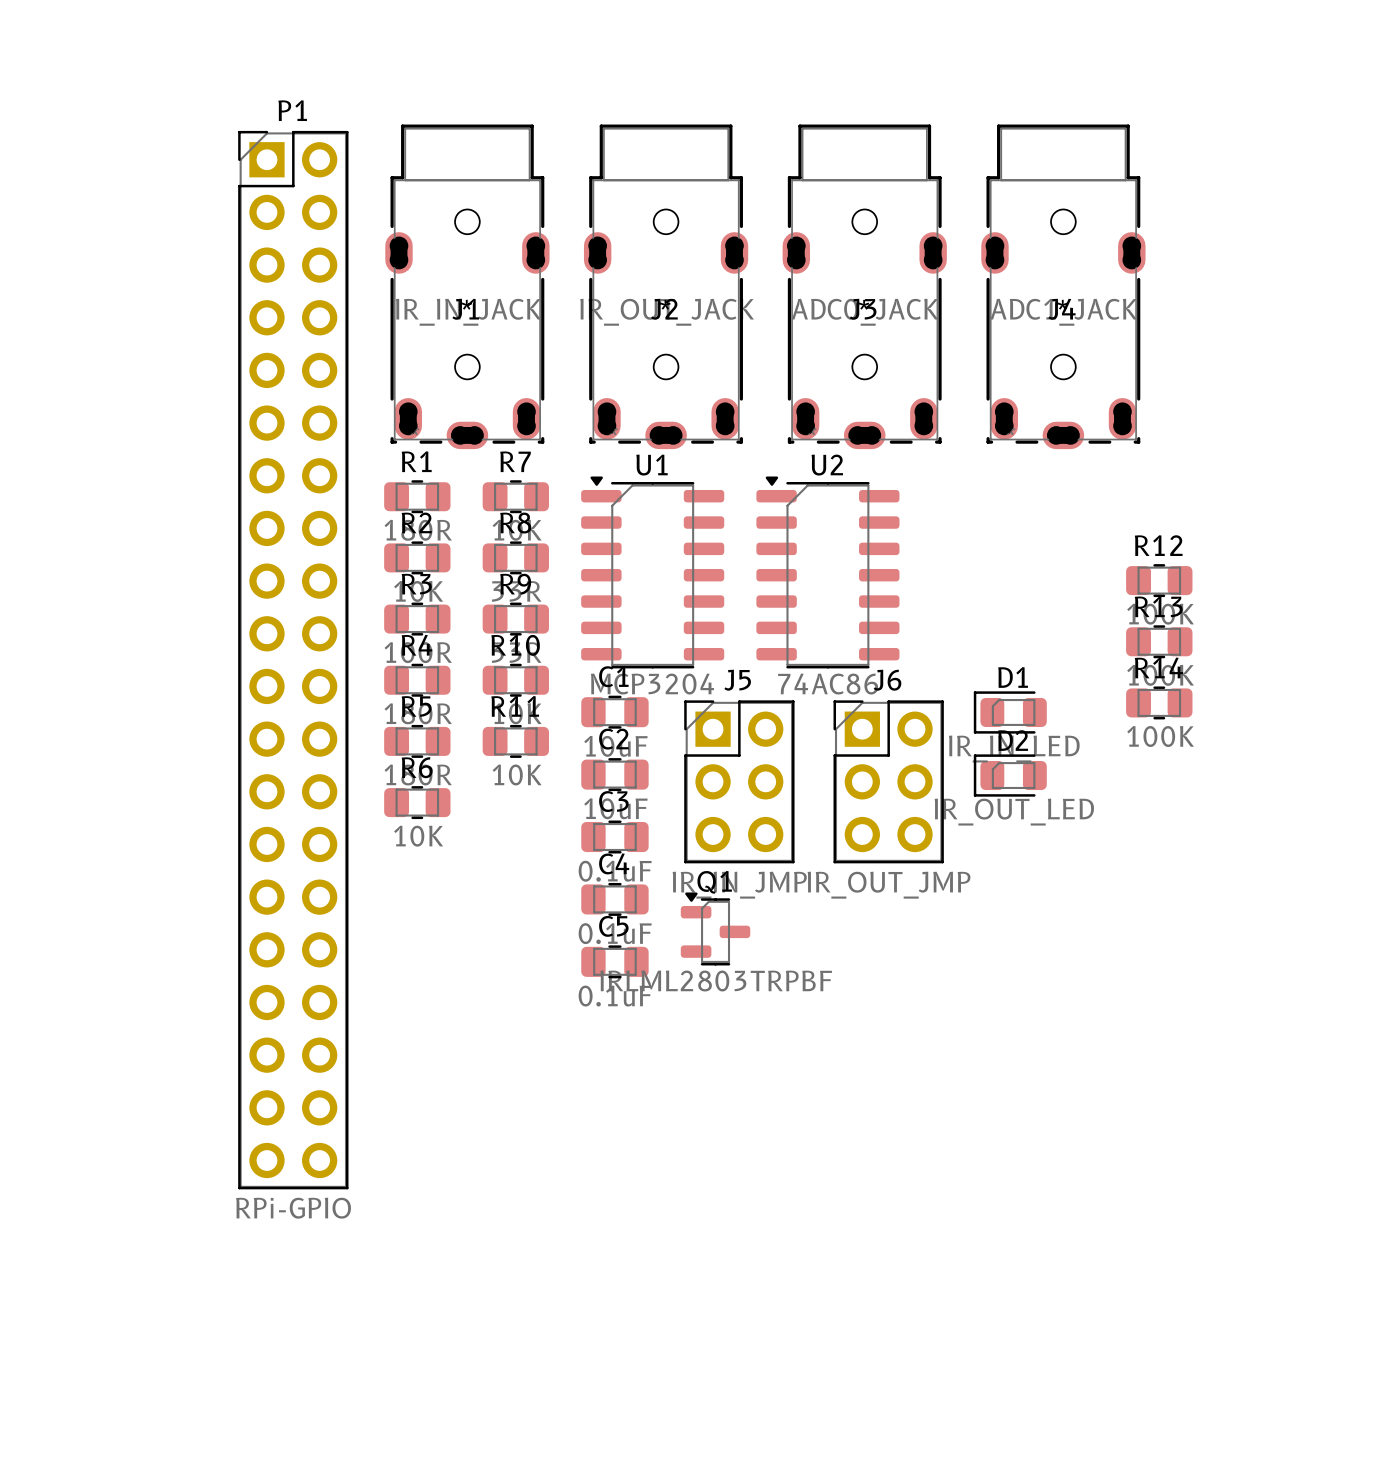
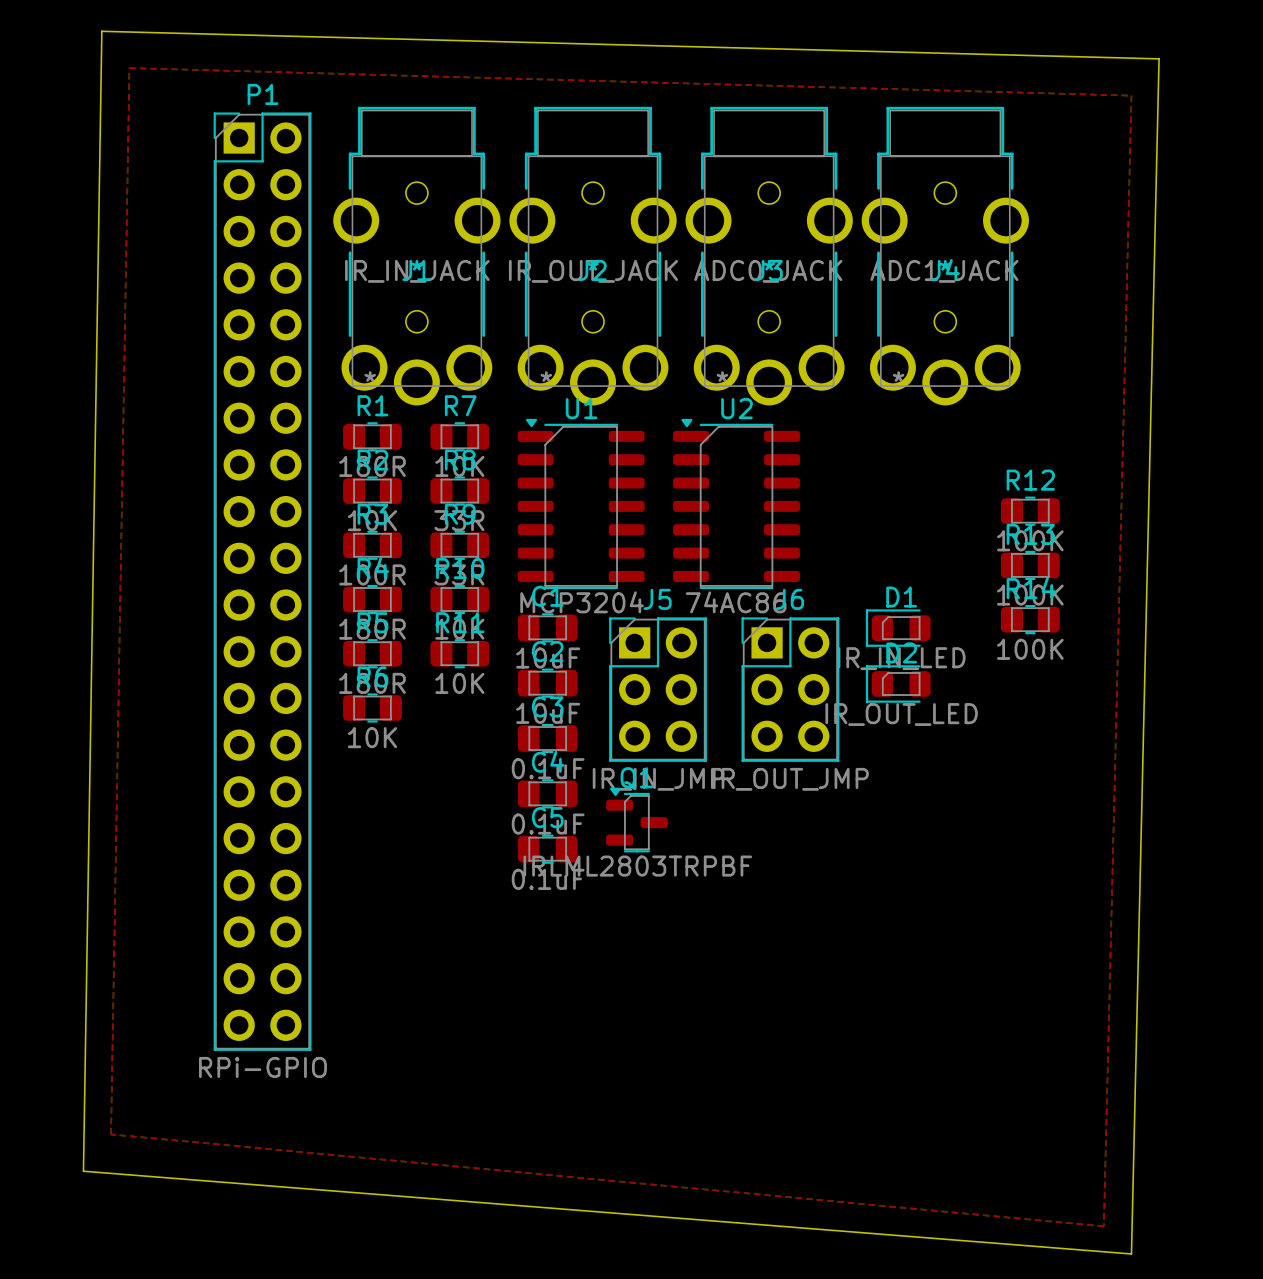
board edge: none -> (101, 31) (83, 1171) (1131, 1253) (1159, 58) (101, 31)
top zone outline: none -> (129, 68) (1131, 95) (1103, 1226) (111, 1134) (129, 68)
J1 footprint: [385, 124, 550, 450] -> [333, 106, 501, 406]
J2 footprint: [583, 124, 749, 450] -> [509, 106, 677, 406]
J3 footprint: [782, 124, 947, 450] -> [685, 106, 853, 406]
J4 footprint: [981, 124, 1146, 450] -> [861, 106, 1029, 406]

